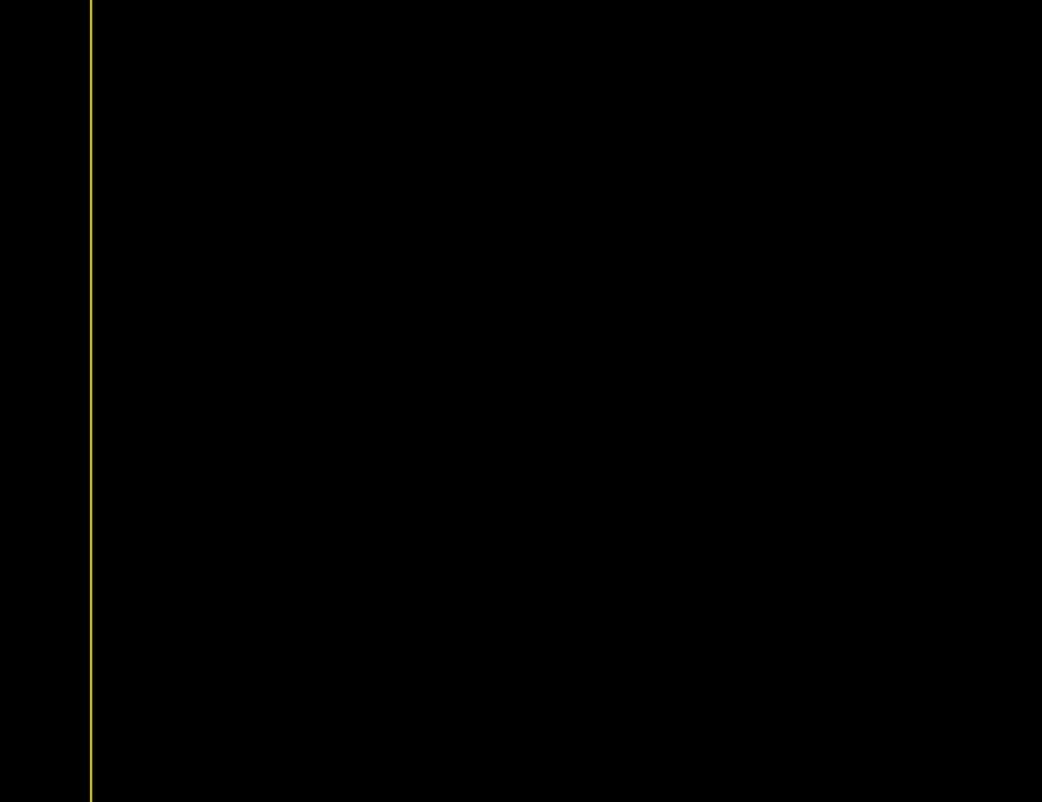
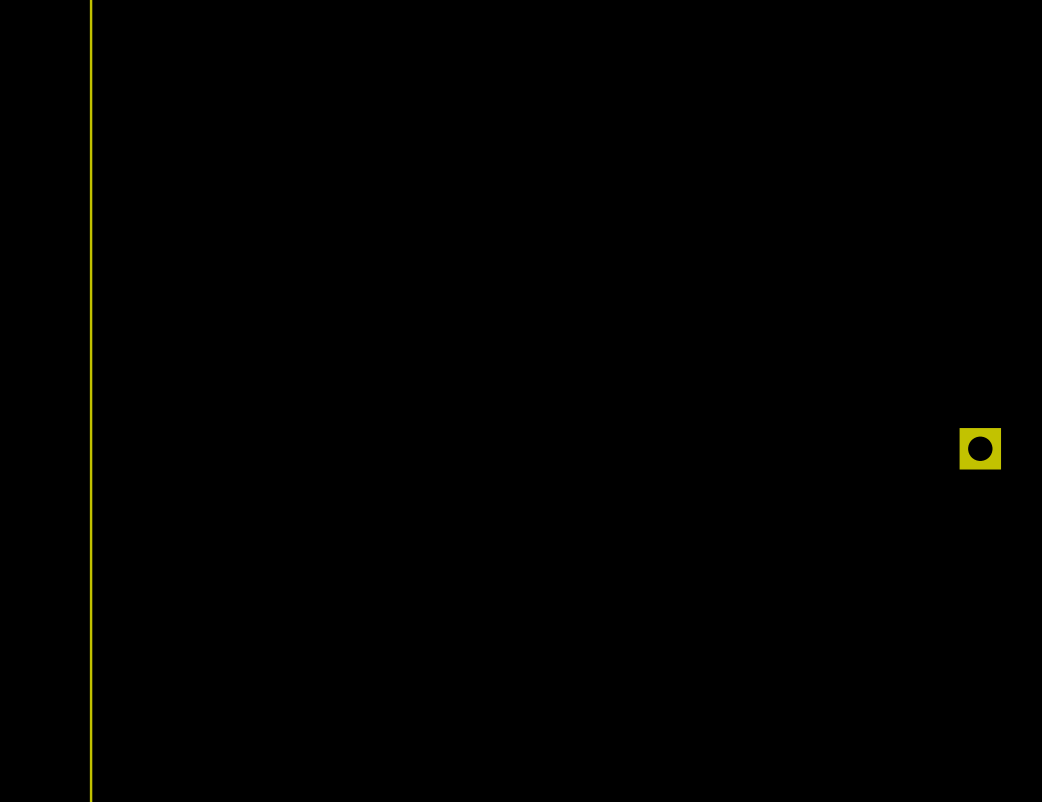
part: none -> (980, 448)

